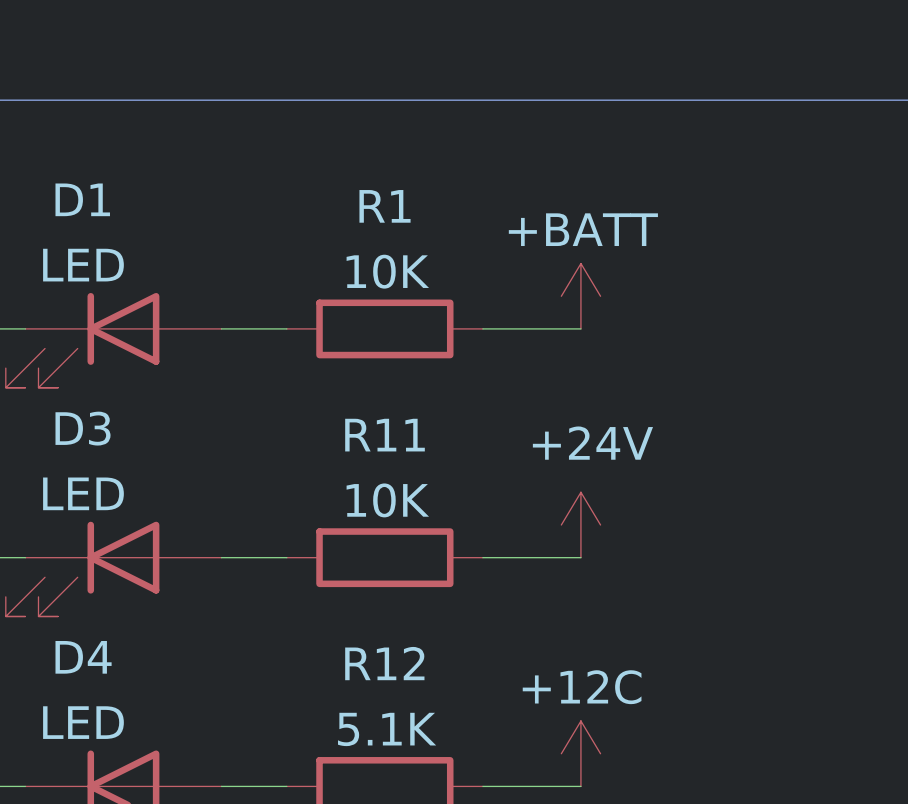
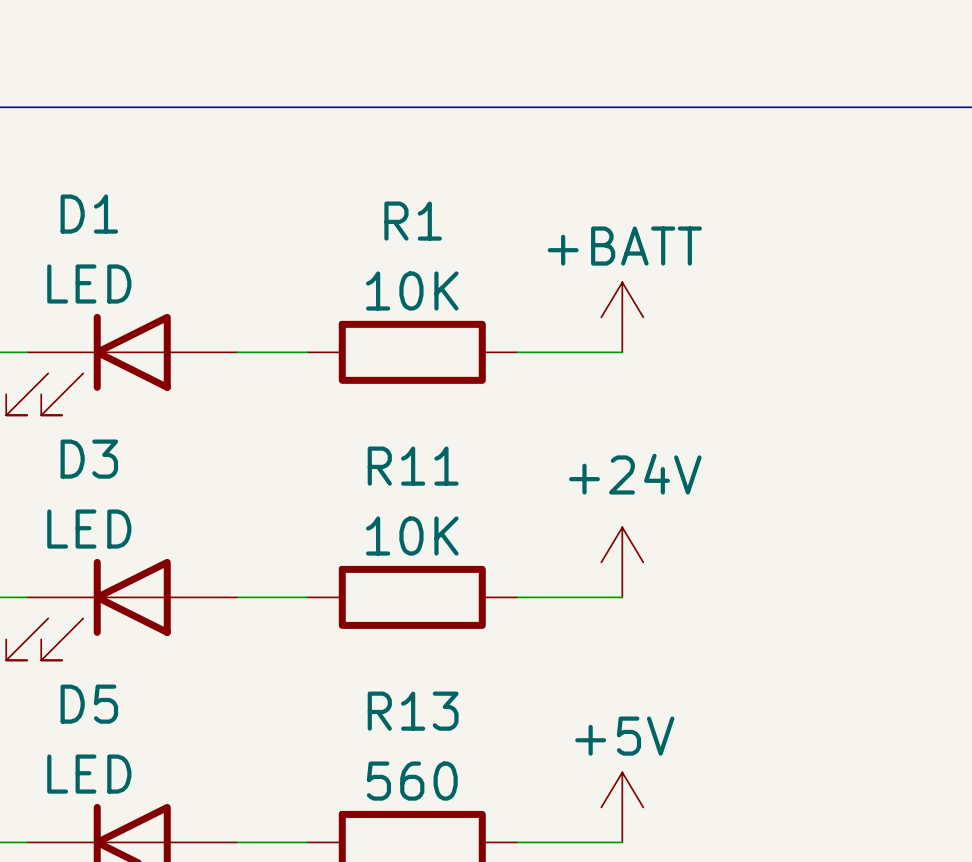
D4 name: D4 (83, 657) -> D5 (89, 704)
R12 name: R12 (384, 663) -> R13 (413, 711)
R12 value: 5.1K (387, 729) -> 560 (412, 781)
power symbol: +12C (580, 753) -> +5V (622, 807)

